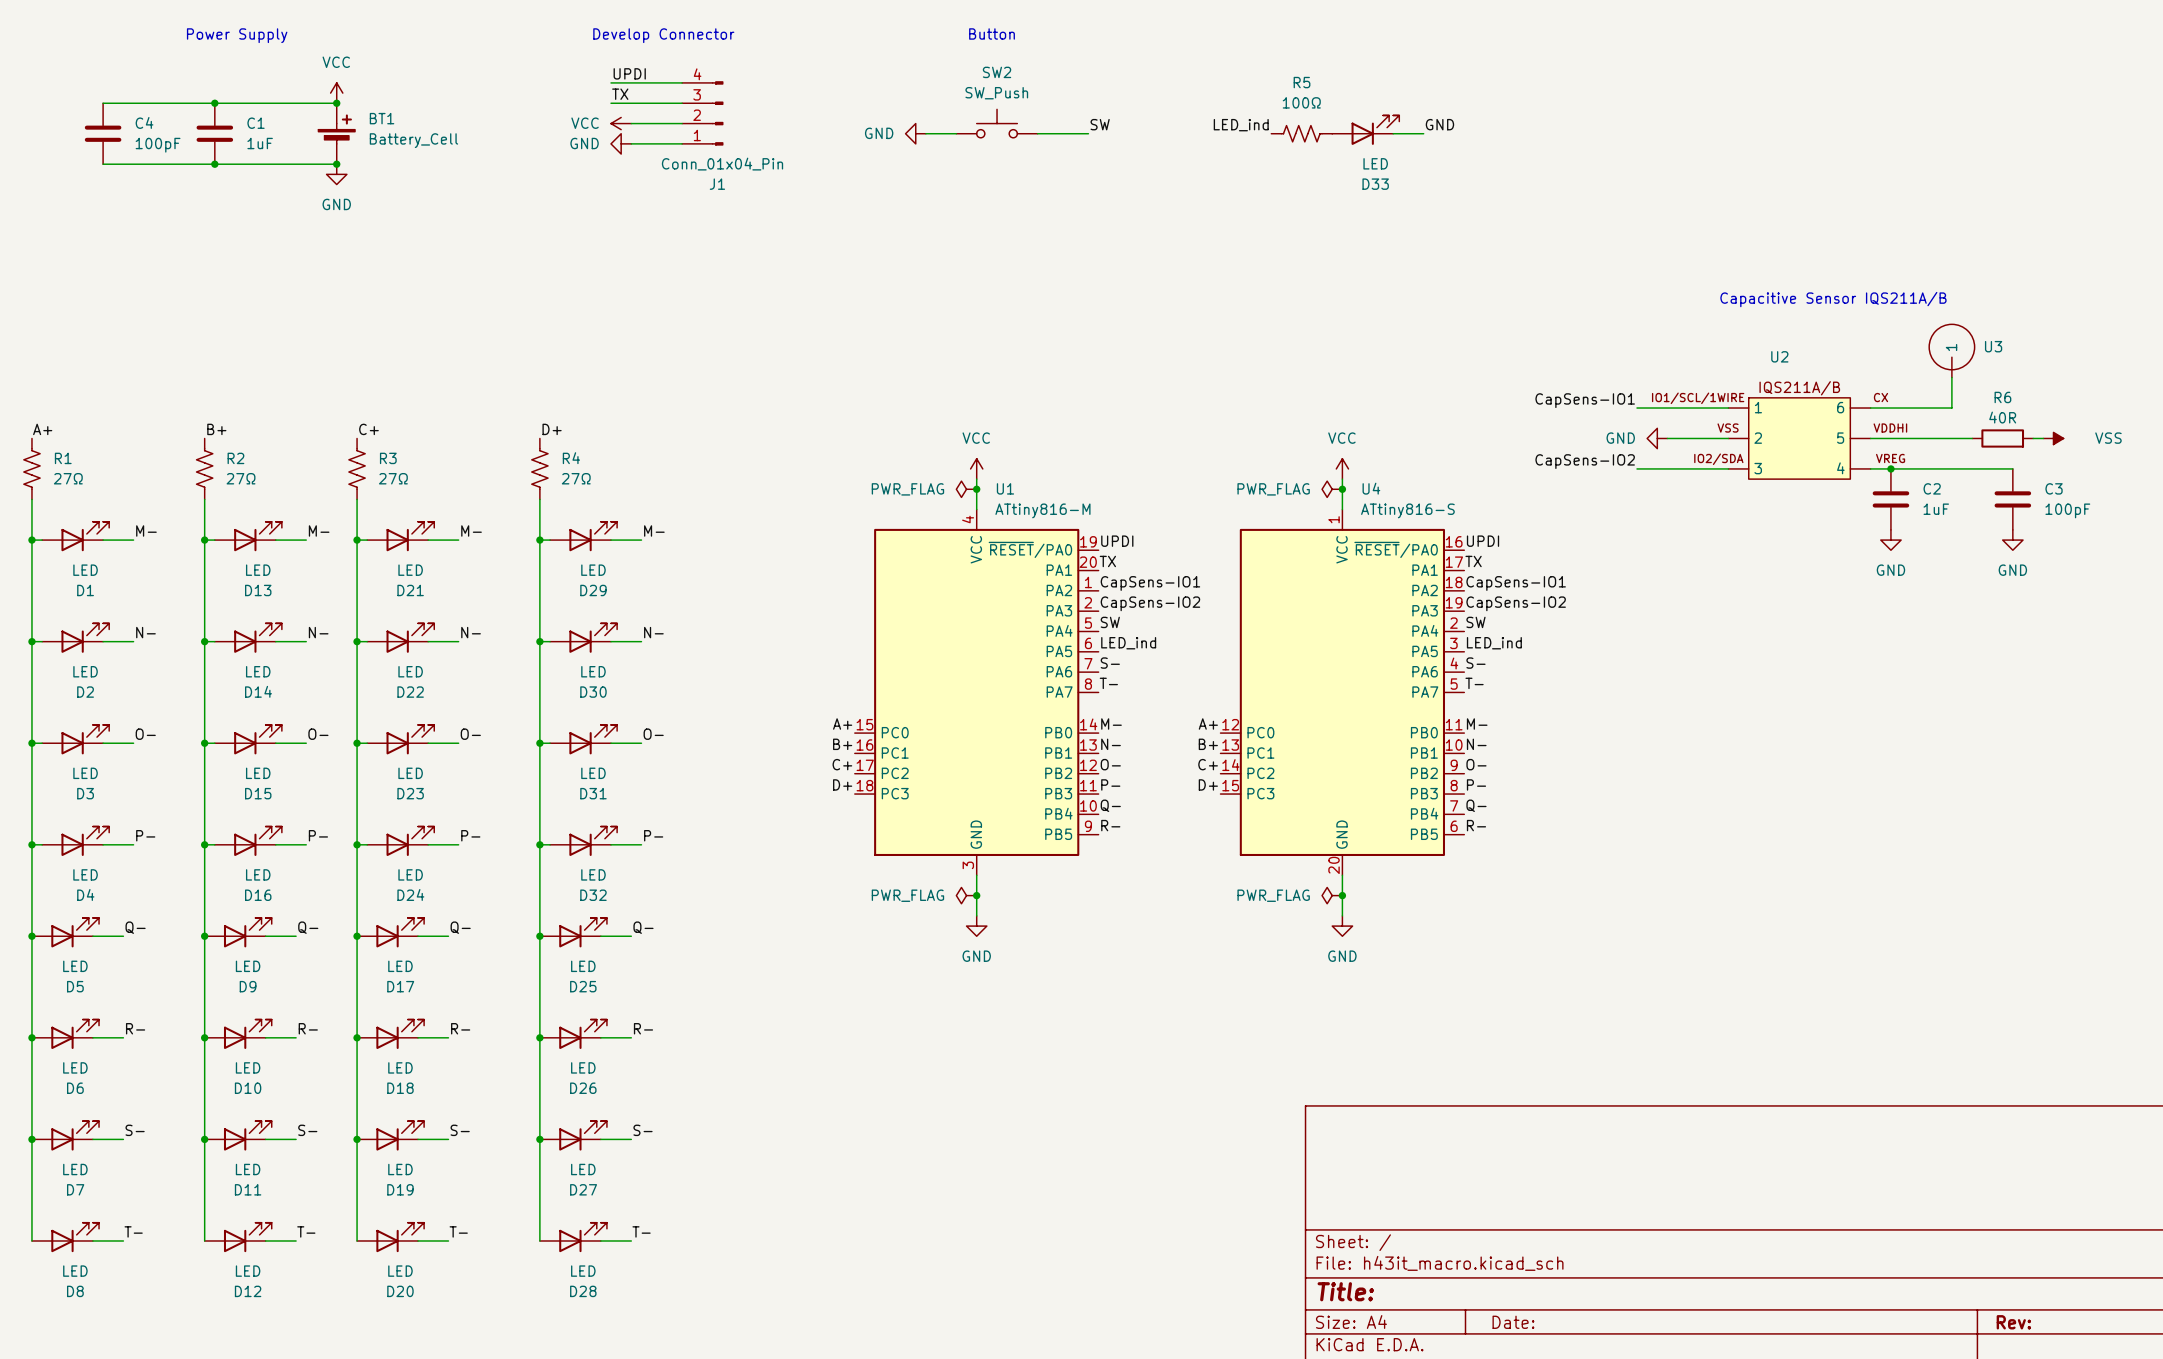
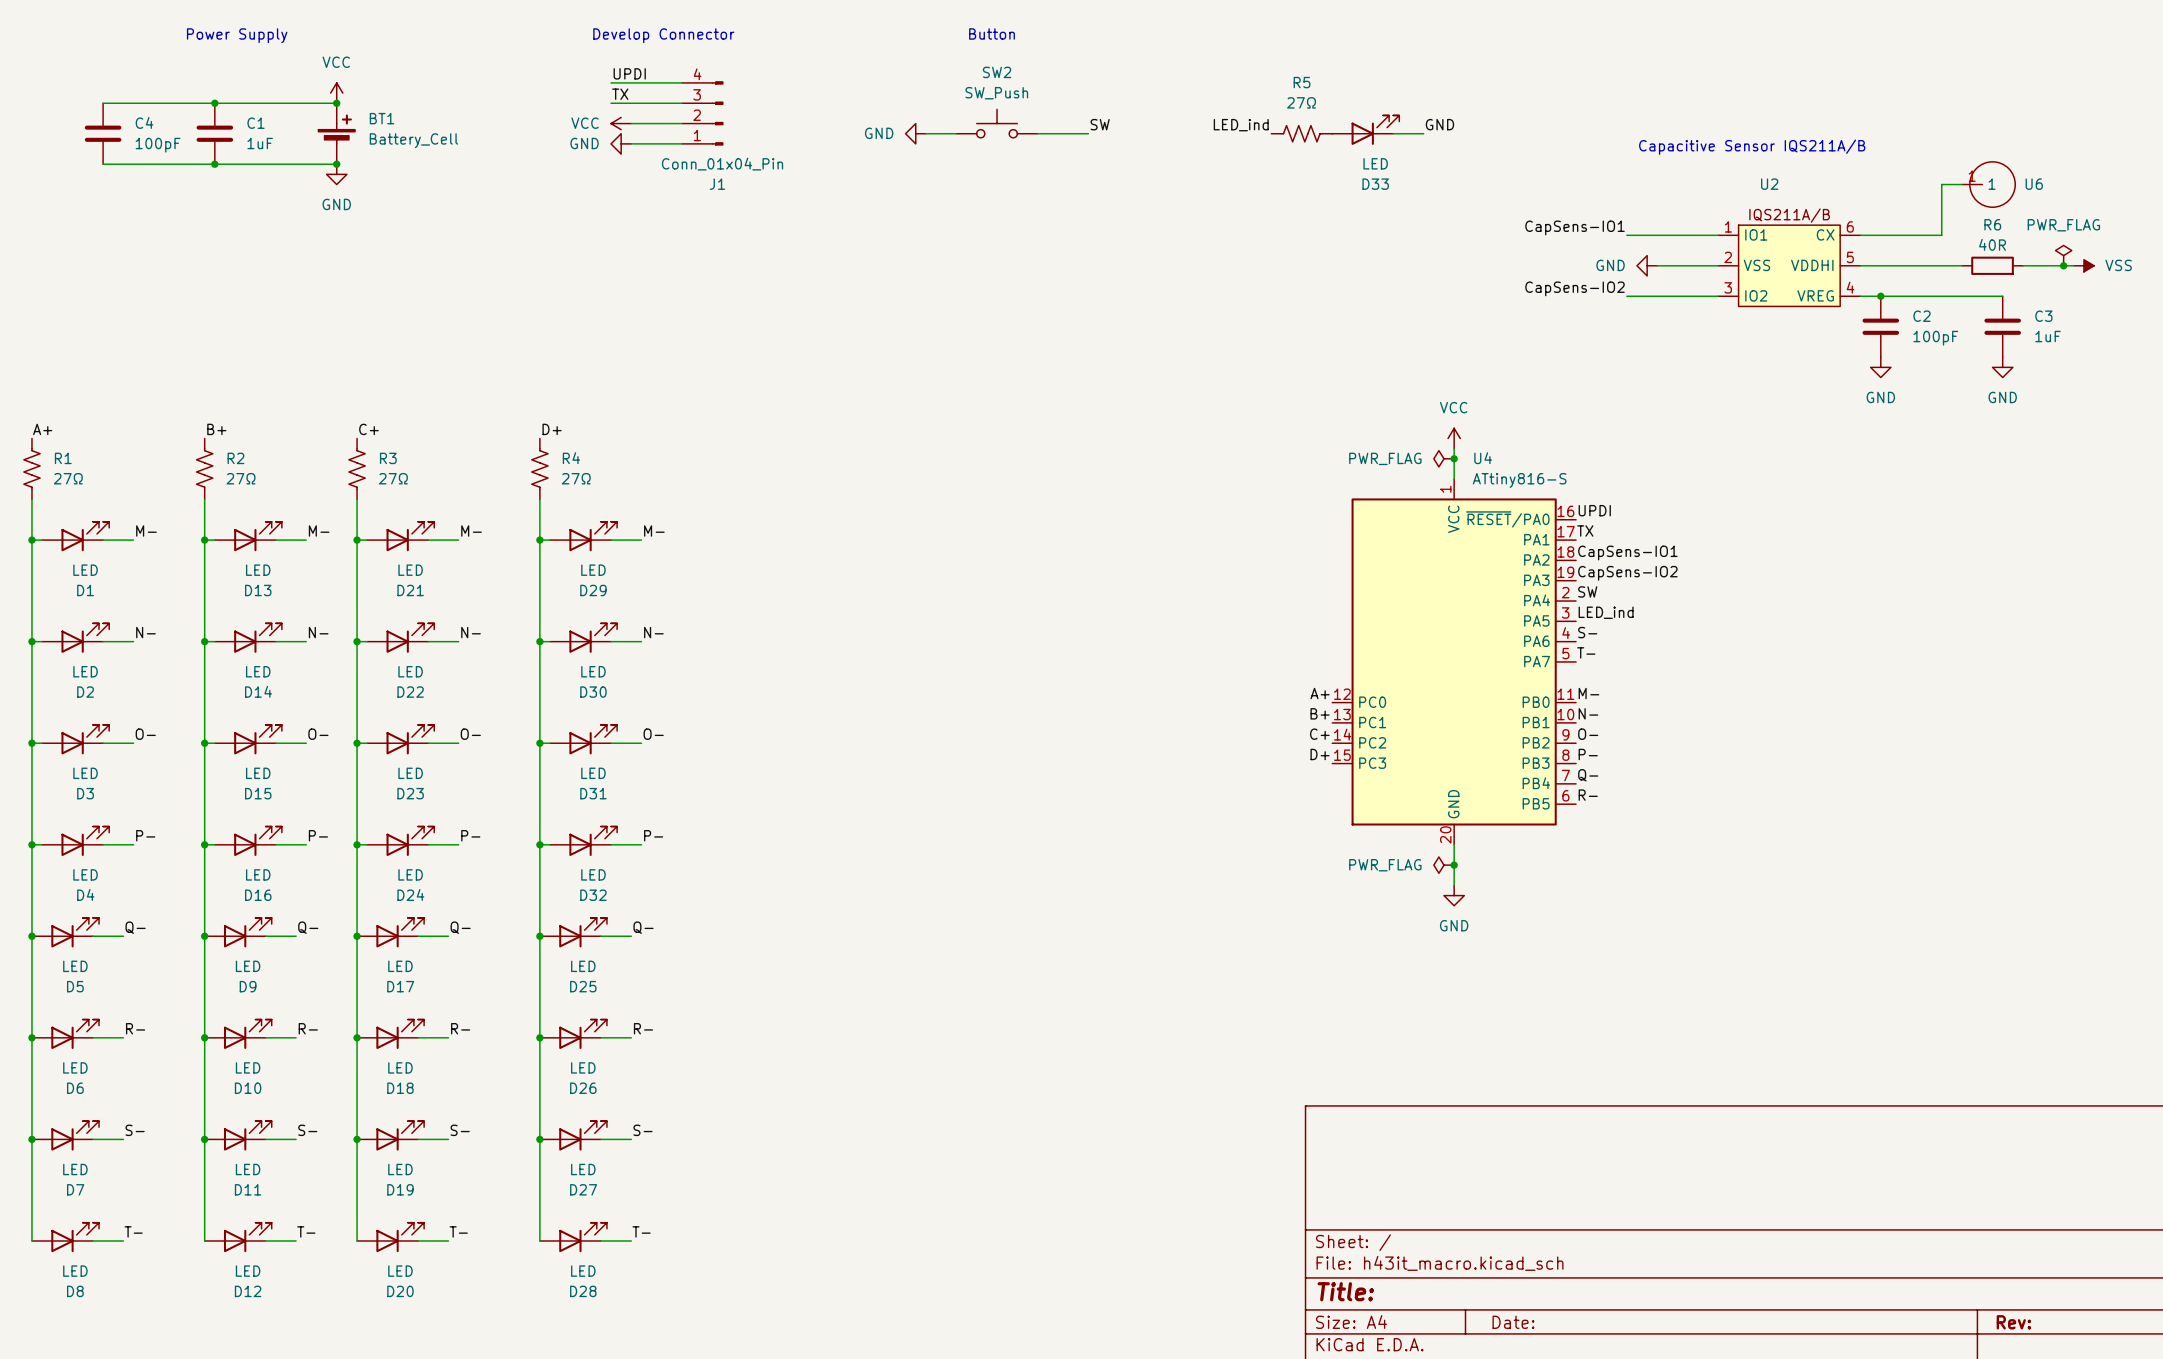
R5 value: 100Ω (1301, 102) -> 27Ω (1301, 102)
wire: none -> (1962, 184) (1941, 184) (1941, 235) (1860, 235)
U6: none -> (1988, 184)
label: none -> CapSens-IO1 (1575, 227)
power symbol: none -> PWR_FLAG (2063, 255)
power symbol: none -> GND (1647, 265)
wire: none -> (2023, 265) (2073, 265)
junction: none -> (2063, 265)
label: none -> CapSens-IO2 (1575, 288)
junction: none -> (1880, 296)
text position: Capacitive Sensor IQS211A/B (1833, 299) -> Capacitive Sensor IQS211A/B (1752, 147)
U3: (1951, 350) -> none
power symbol: none -> GND (1880, 367)
power symbol: none -> GND (2002, 367)
wire: (1951, 377) (1951, 408) (1870, 408) -> none
U2 symbol: [1728, 397, 1871, 480] -> [1718, 225, 1861, 307]
label: CapSens-IO1 (1585, 400) -> none
wire: (1636, 408) (1728, 408) -> (1626, 235) (1718, 235)
power symbol: GND (1657, 438) -> none
wire: (1667, 438) (1728, 438) -> (1657, 265) (1718, 265)
wire: (1870, 438) (1972, 438) -> (1860, 265) (1962, 265)
R6 position: (2002, 438) -> (1992, 265)
wire: (2033, 438) (2043, 438) -> none
power symbol position: VSS (2053, 438) -> VSS (2083, 265)
power symbol text position: VSS (2108, 438) -> VSS (2118, 265)
junction: none -> (1454, 458)
label: CapSens-IO2 (1585, 461) -> none
power symbol: VCC (976, 468) -> none
power symbol position: VCC (1342, 468) -> VCC (1454, 438)
wire: (1636, 468) (1728, 468) -> (1626, 296) (1718, 296)
wire: (1870, 468) (2012, 468) -> (1860, 296) (2002, 296)
junction: (1890, 468) -> none
wire: (976, 479) (976, 509) -> none
wire: (1342, 479) (1342, 509) -> (1454, 448) (1454, 479)
power symbol: PWR_FLAG (966, 489) -> none
junction: (976, 489) -> none
power symbol position: PWR_FLAG (1332, 489) -> PWR_FLAG (1443, 458)
junction: (1342, 489) -> none
C2 position: (1890, 499) -> (1880, 326)
C3 position: (2012, 499) -> (2002, 326)
C2 value: 1uF (1936, 509) -> 100pF (1935, 338)
C3 value: 100pF (2067, 510) -> 1uF (2048, 336)
power symbol: GND (1890, 540) -> none
power symbol: GND (2012, 540) -> none
label: UPDI (1117, 541) -> none
label position: UPDI (1483, 541) -> UPDI (1594, 510)
label: none -> CapSens-IO1 (1627, 553)
label: TX (1107, 561) -> none
label position: TX (1473, 561) -> TX (1585, 531)
label: CapSens-IO1 (1150, 583) -> none
label: CapSens-IO1 (1516, 583) -> CapSens-IO2 (1627, 573)
label: CapSens-IO2 (1150, 603) -> none
label: CapSens-IO2 (1516, 603) -> none
label: SW (1110, 622) -> none
label position: SW (1475, 622) -> SW (1587, 591)
label: LED_ind (1128, 643) -> none
label position: LED_ind (1494, 643) -> LED_ind (1606, 612)
label: S- (1110, 663) -> none
label position: S- (1475, 663) -> S- (1587, 632)
label: T- (1108, 683) -> none
label position: T- (1474, 683) -> T- (1586, 652)
U1: ATtiny816-M (976, 692) -> none
U4 position: (1342, 692) -> (1454, 661)
label: A+ (842, 724) -> none
label: M- (1111, 724) -> none
label position: A+ (1208, 724) -> A+ (1320, 693)
label position: M- (1477, 724) -> M- (1588, 693)
label: B+ (842, 744) -> none
label: N- (1111, 744) -> none
label position: B+ (1208, 744) -> B+ (1320, 713)
label position: N- (1476, 744) -> N- (1588, 713)
label: C+ (842, 764) -> none
label: O- (1110, 764) -> none
label position: C+ (1208, 764) -> C+ (1319, 734)
label position: O- (1476, 764) -> O- (1588, 734)
label: D+ (842, 784) -> none
label: P- (1110, 784) -> none
label position: D+ (1208, 784) -> D+ (1320, 754)
label position: P- (1476, 784) -> P- (1588, 754)
label: Q- (1110, 805) -> none
label position: Q- (1476, 805) -> Q- (1588, 775)
label: R- (1110, 825) -> none
label position: R- (1476, 825) -> R- (1588, 795)
junction: none -> (1454, 865)
wire: (976, 875) (976, 915) -> none
wire: (1342, 875) (1342, 915) -> (1454, 844) (1454, 885)
power symbol: PWR_FLAG (966, 895) -> none
junction: (976, 895) -> none
power symbol position: PWR_FLAG (1332, 895) -> PWR_FLAG (1443, 865)
junction: (1342, 895) -> none
power symbol: GND (976, 926) -> none
power symbol position: GND (1342, 926) -> GND (1454, 895)

